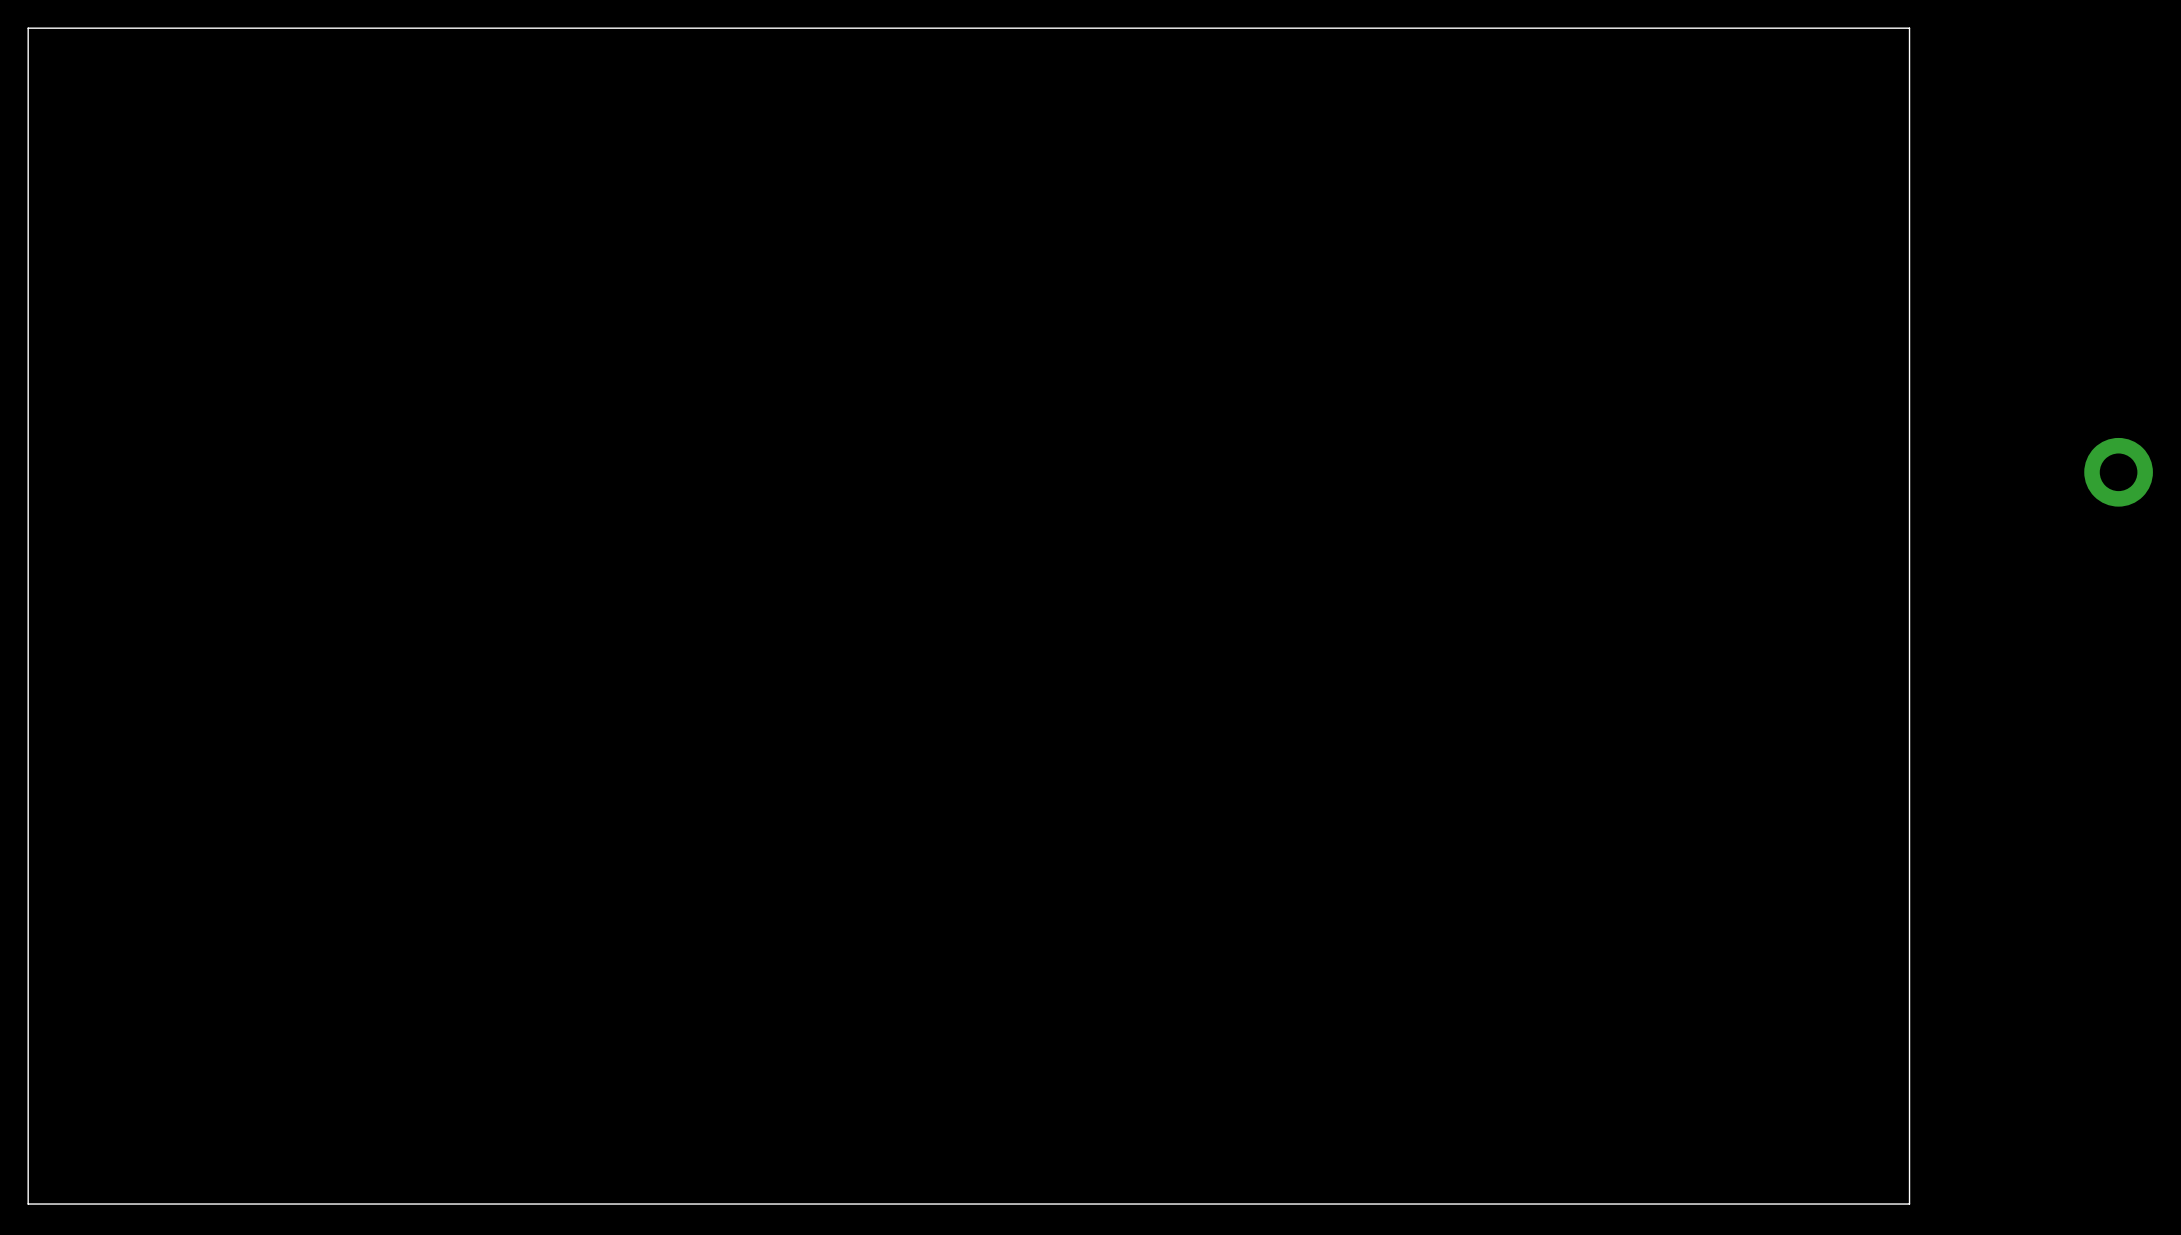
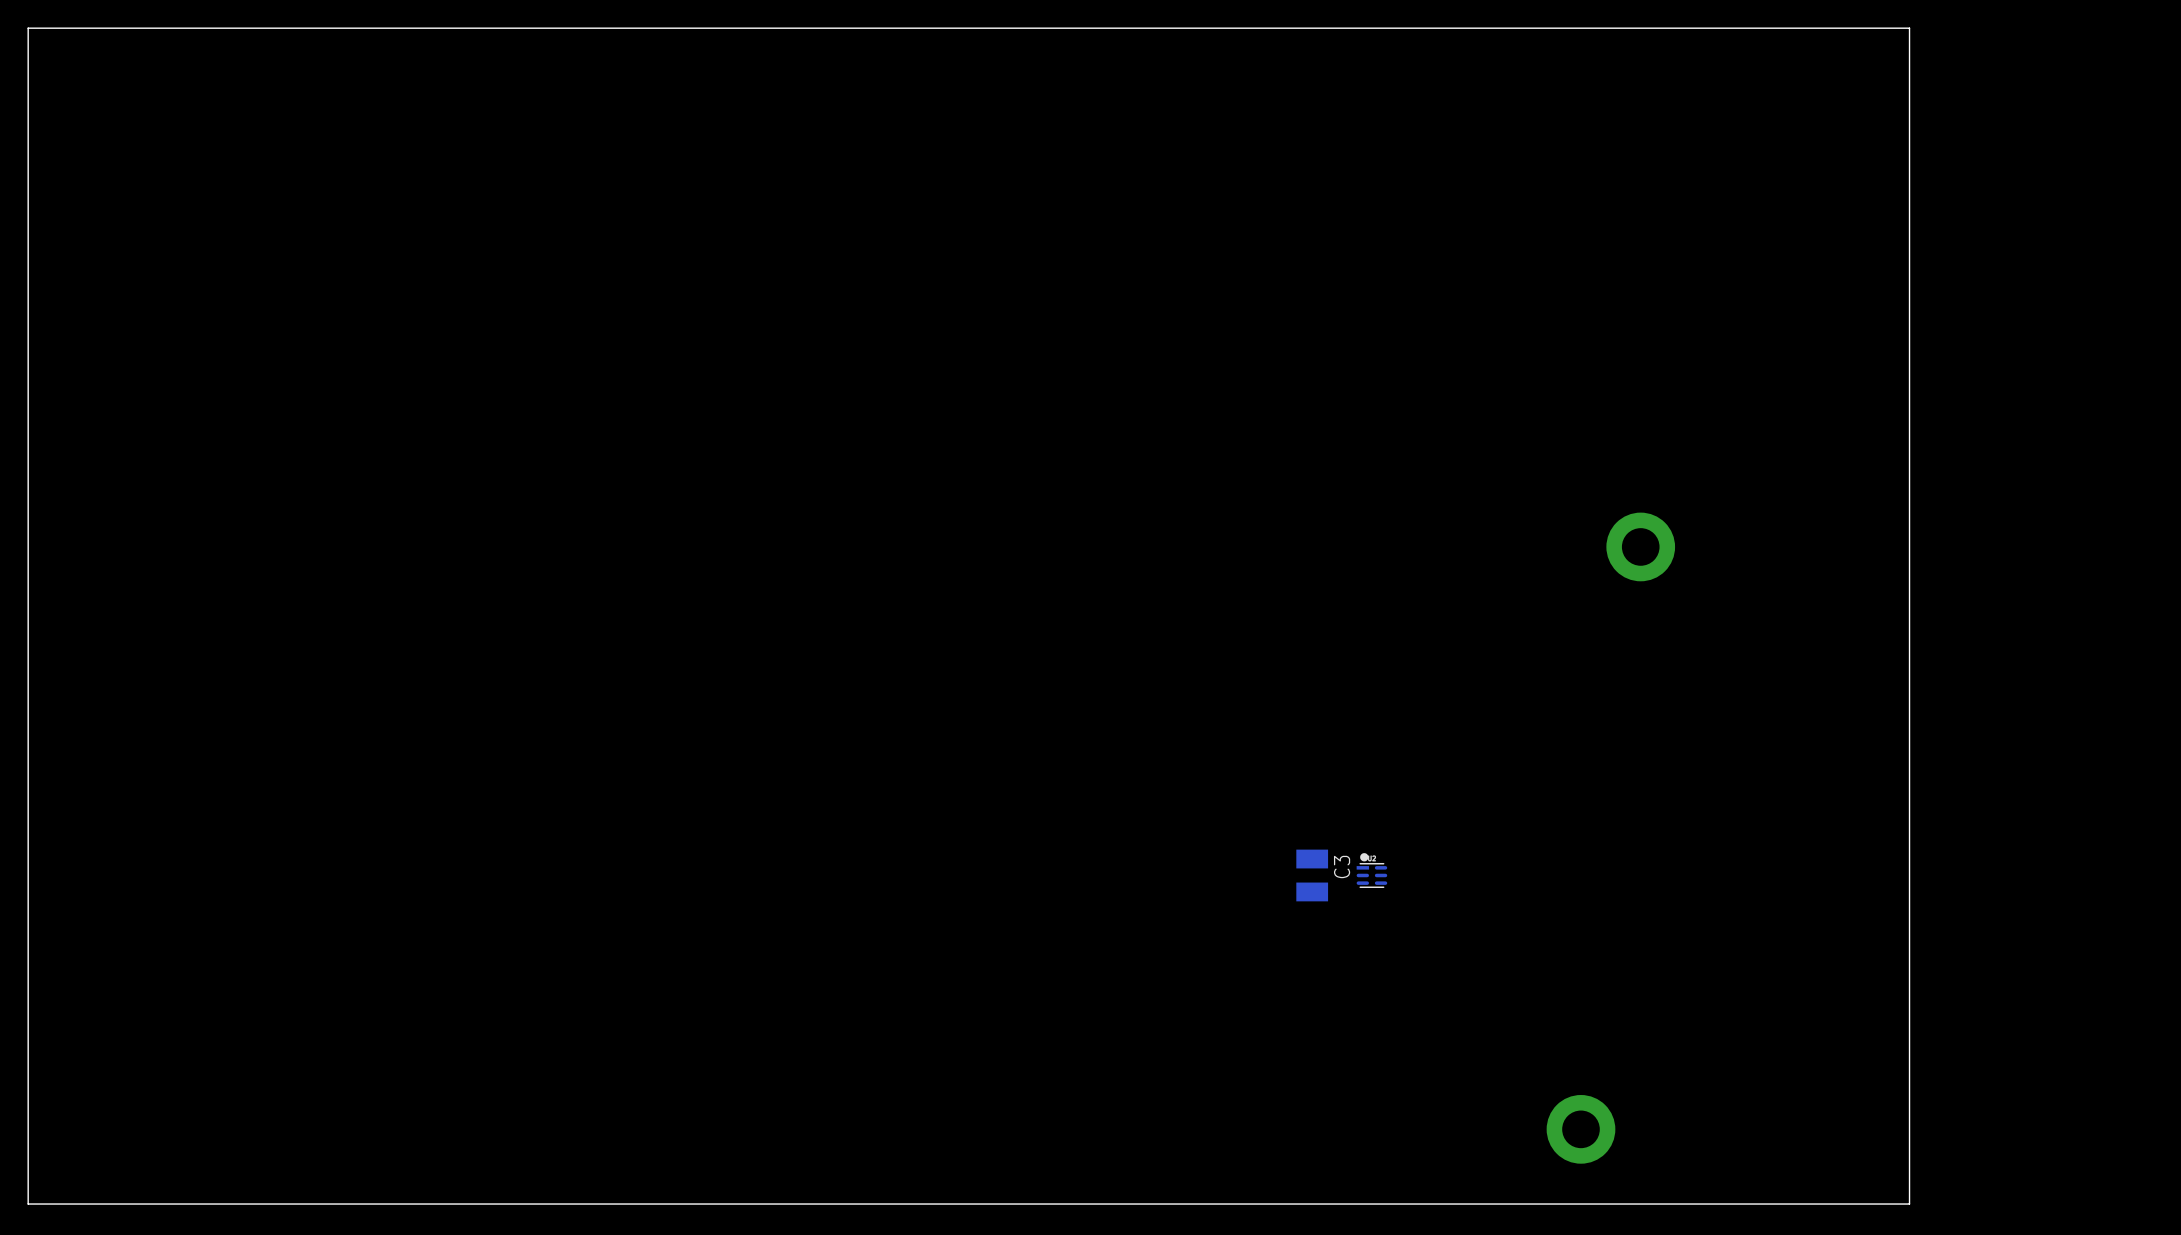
part: (2118, 472) -> none
part: none -> (1640, 546)
part: none -> (1371, 870)
C3: none -> (1312, 875)
part: none -> (1580, 1129)

